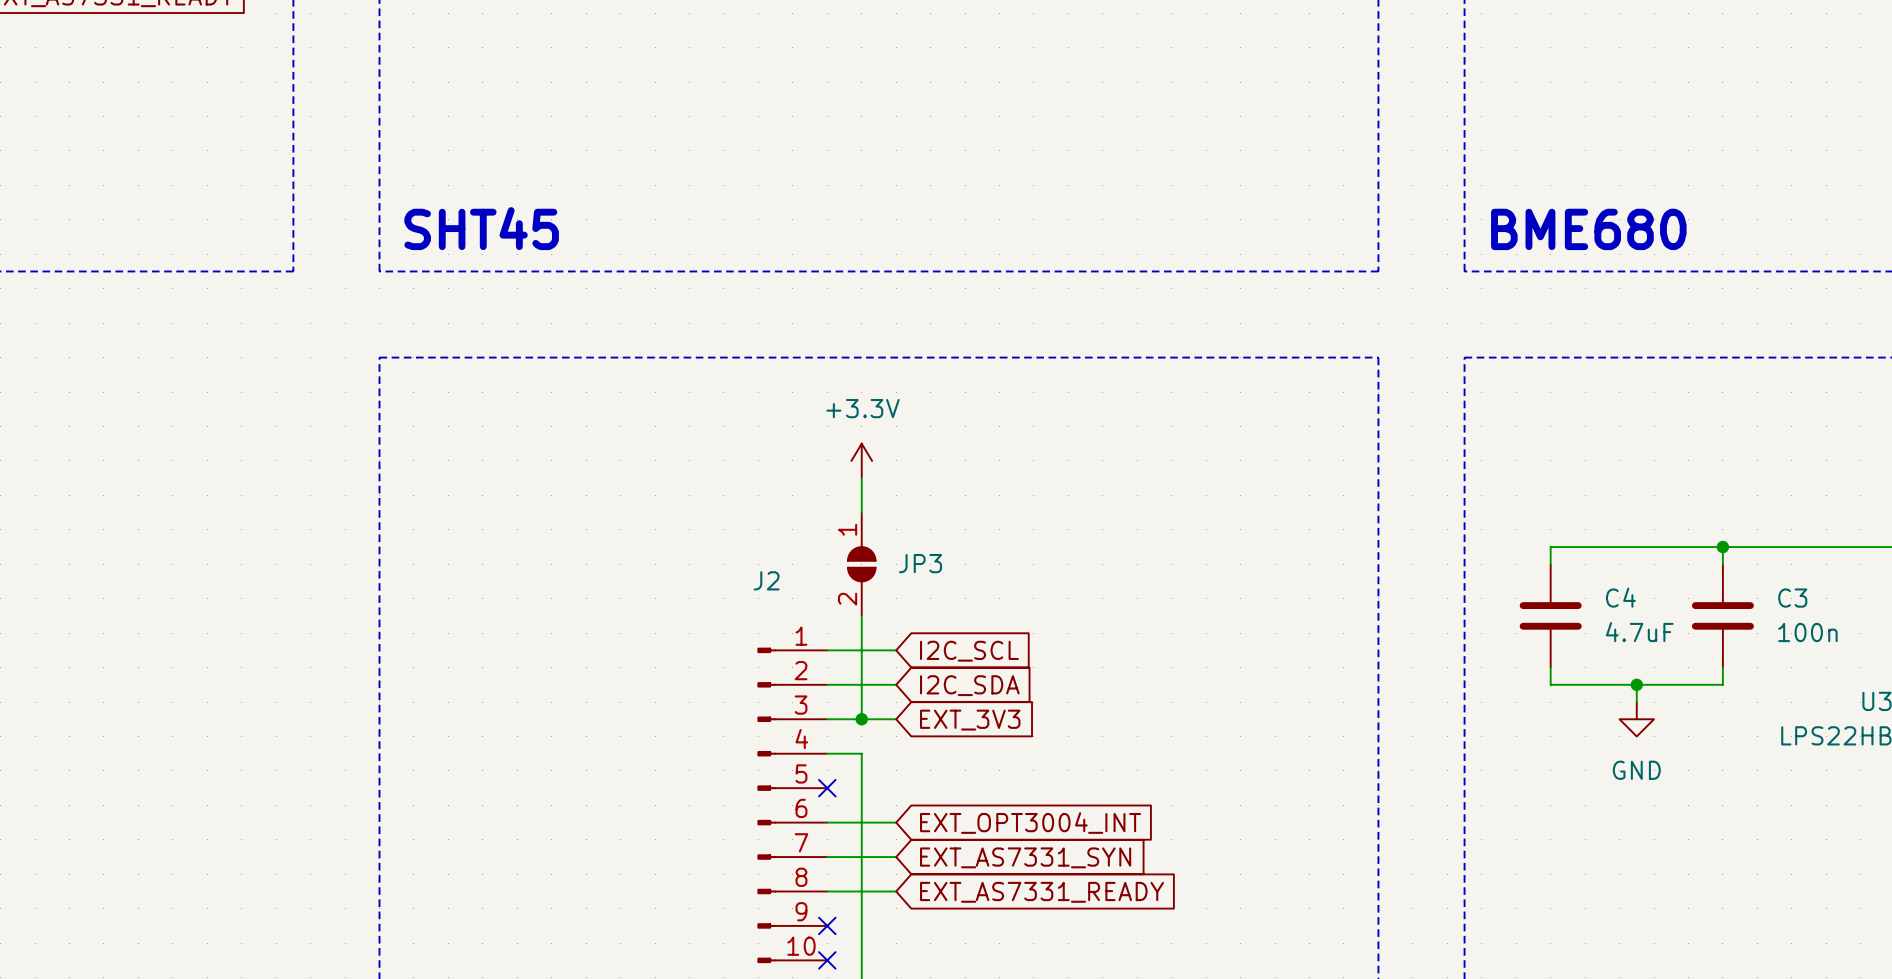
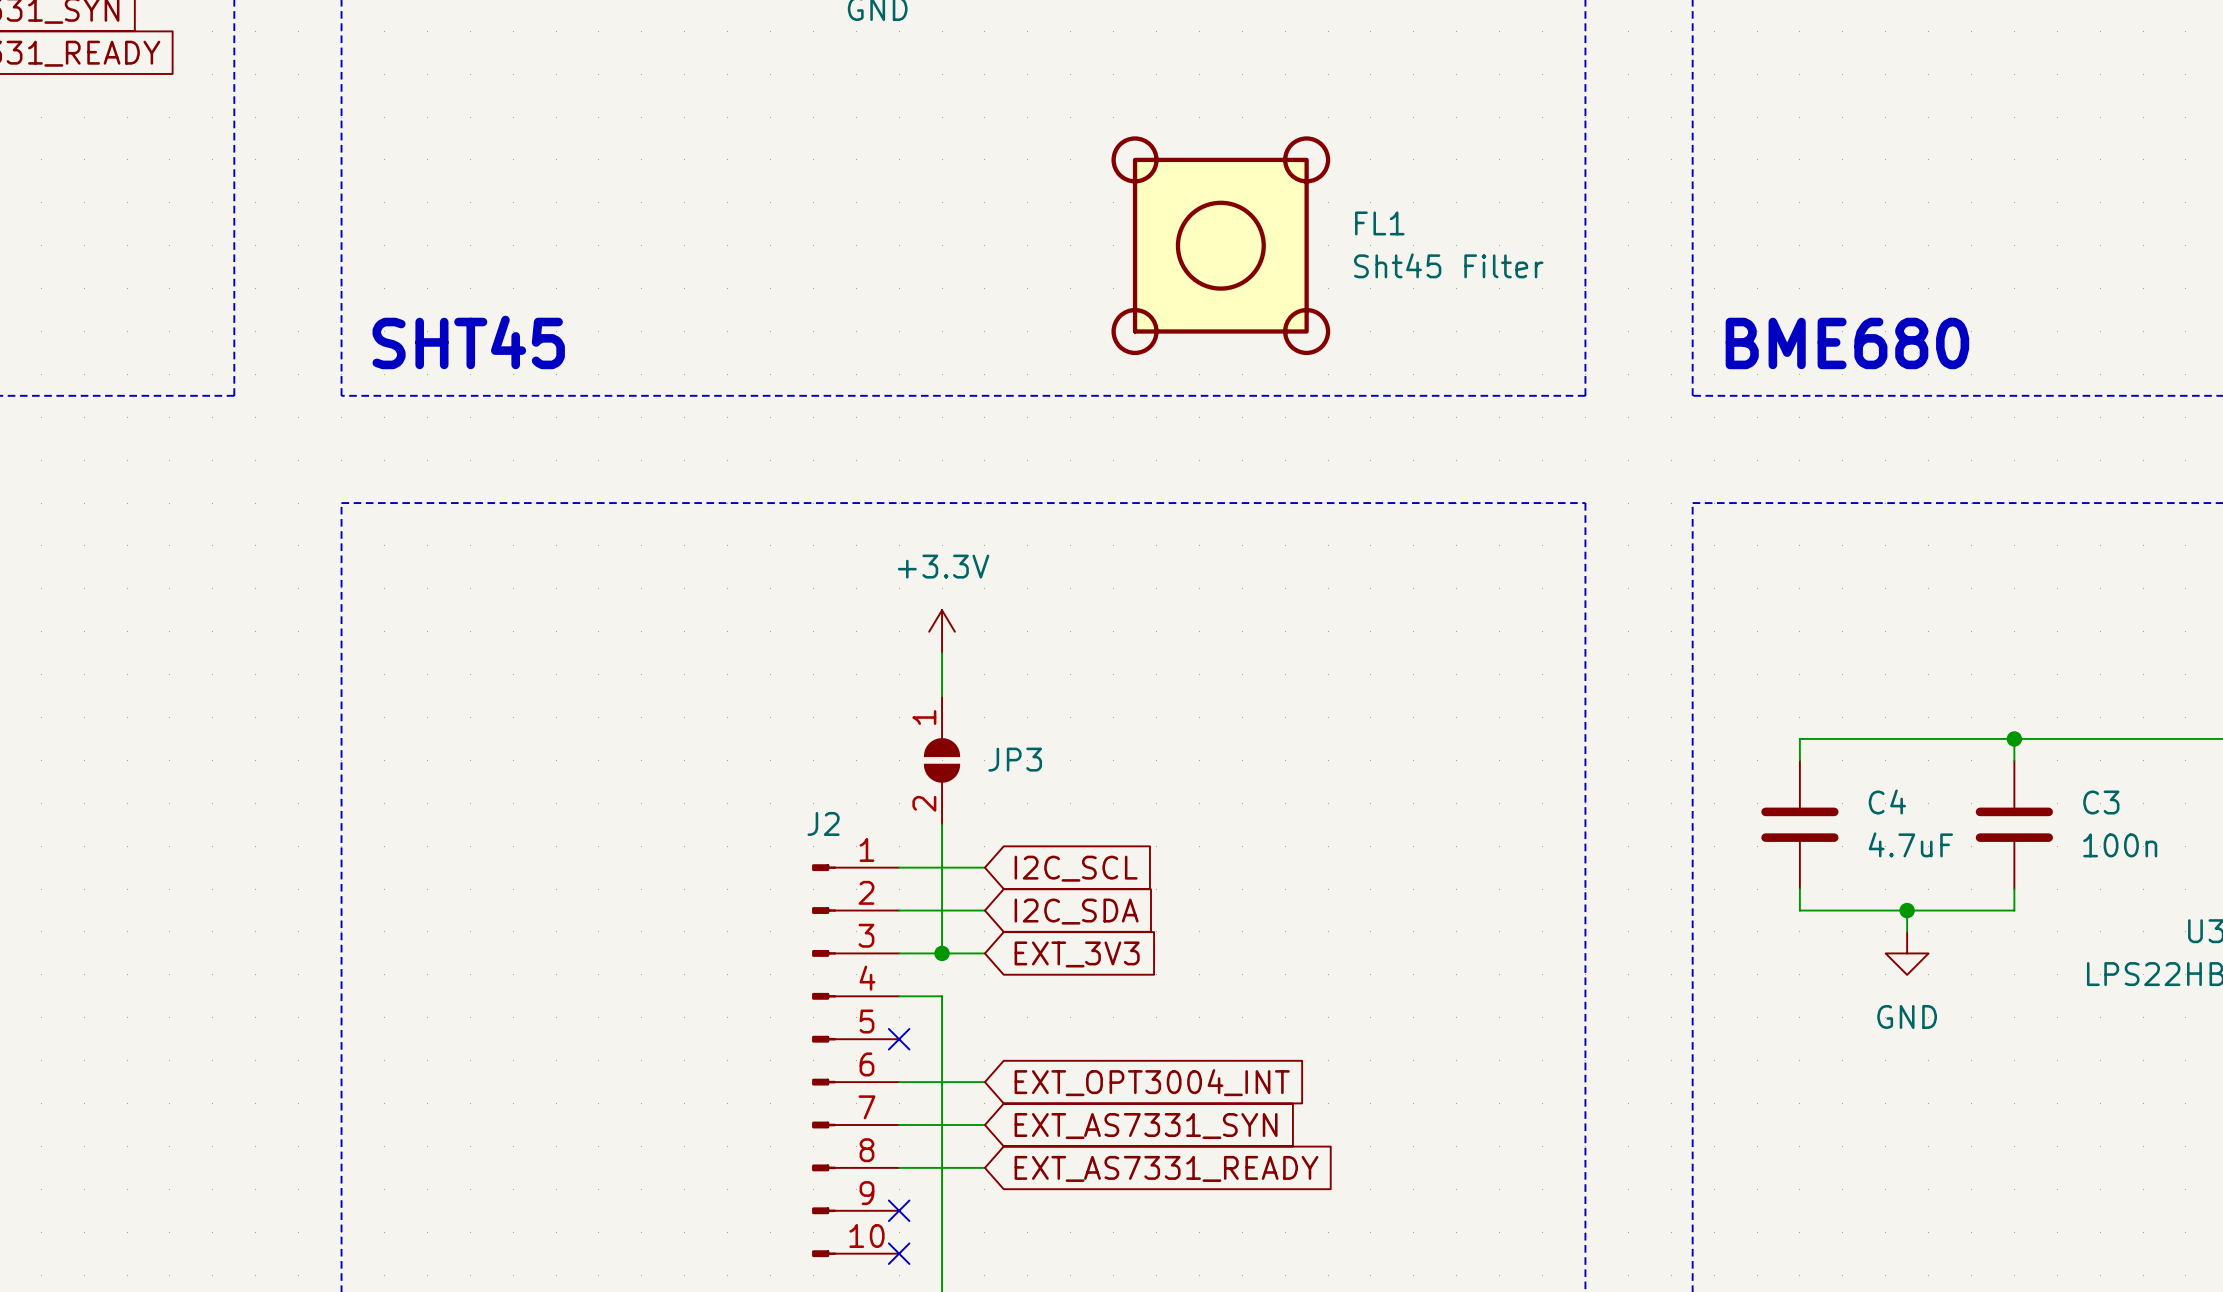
FL1: none -> Sht45 Filter (1220, 245)
J2 name position: J2 (766, 580) -> J2 (823, 823)

